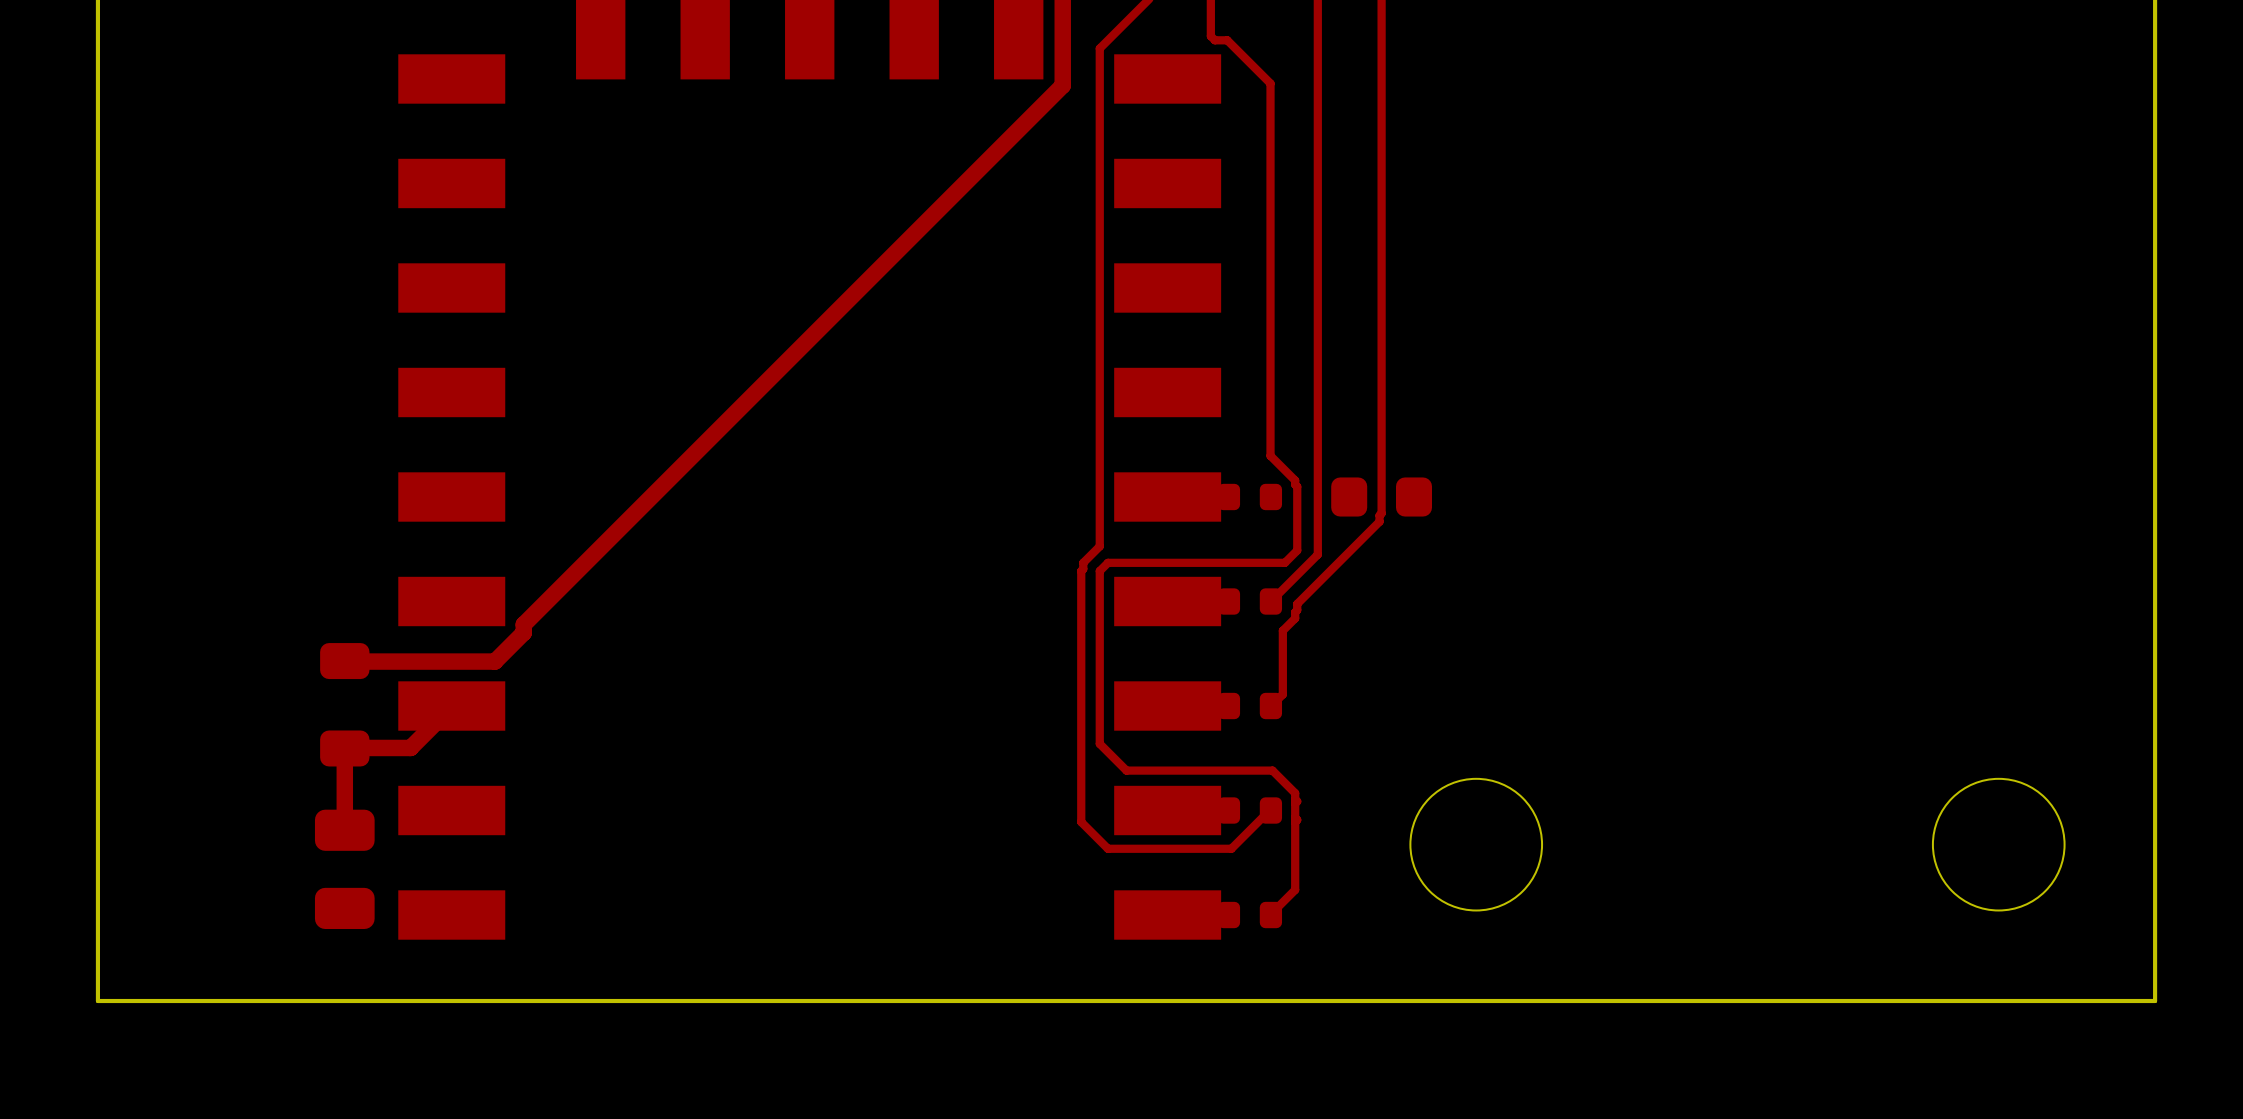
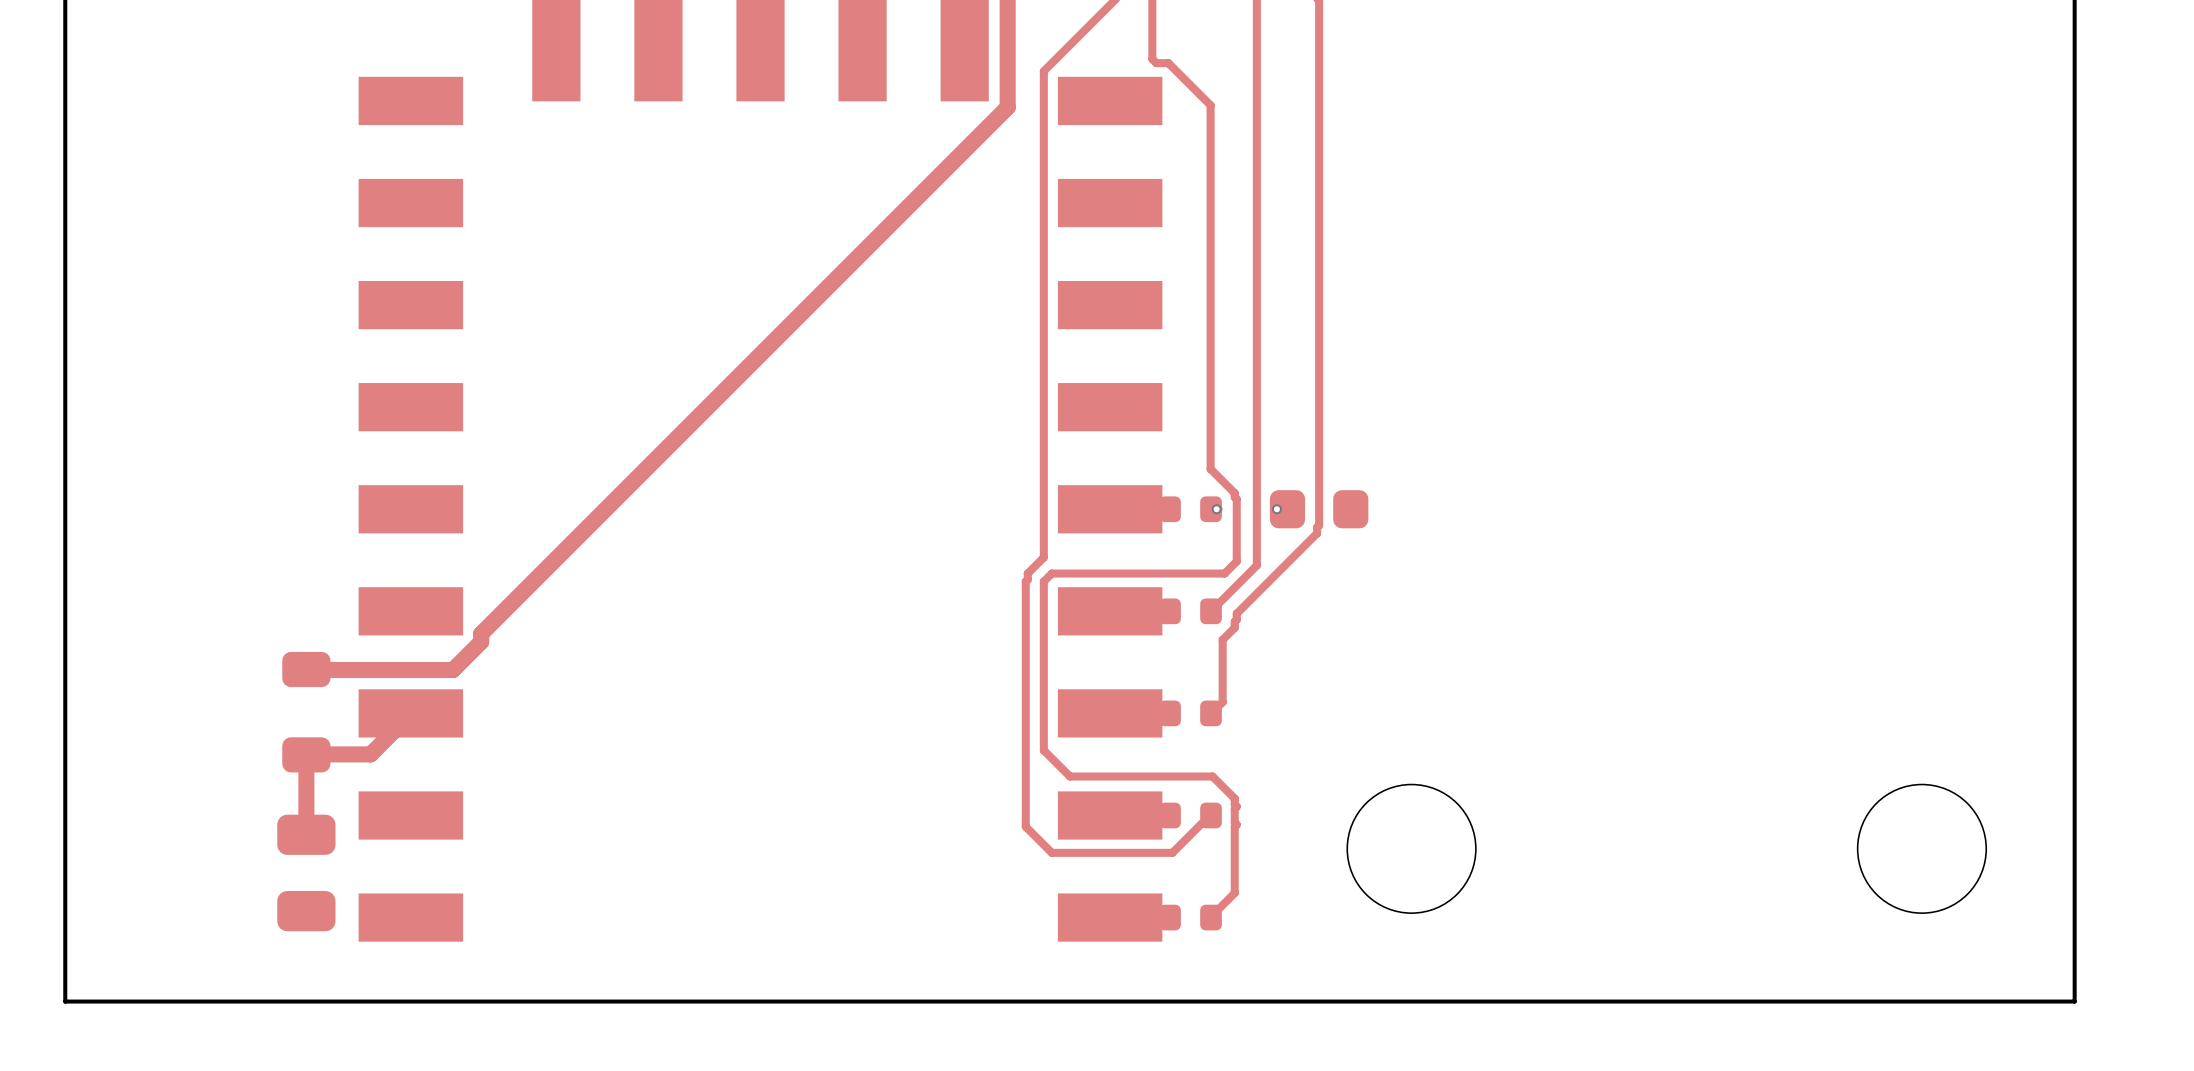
via: none -> (1216, 509)
via: none -> (1276, 509)

